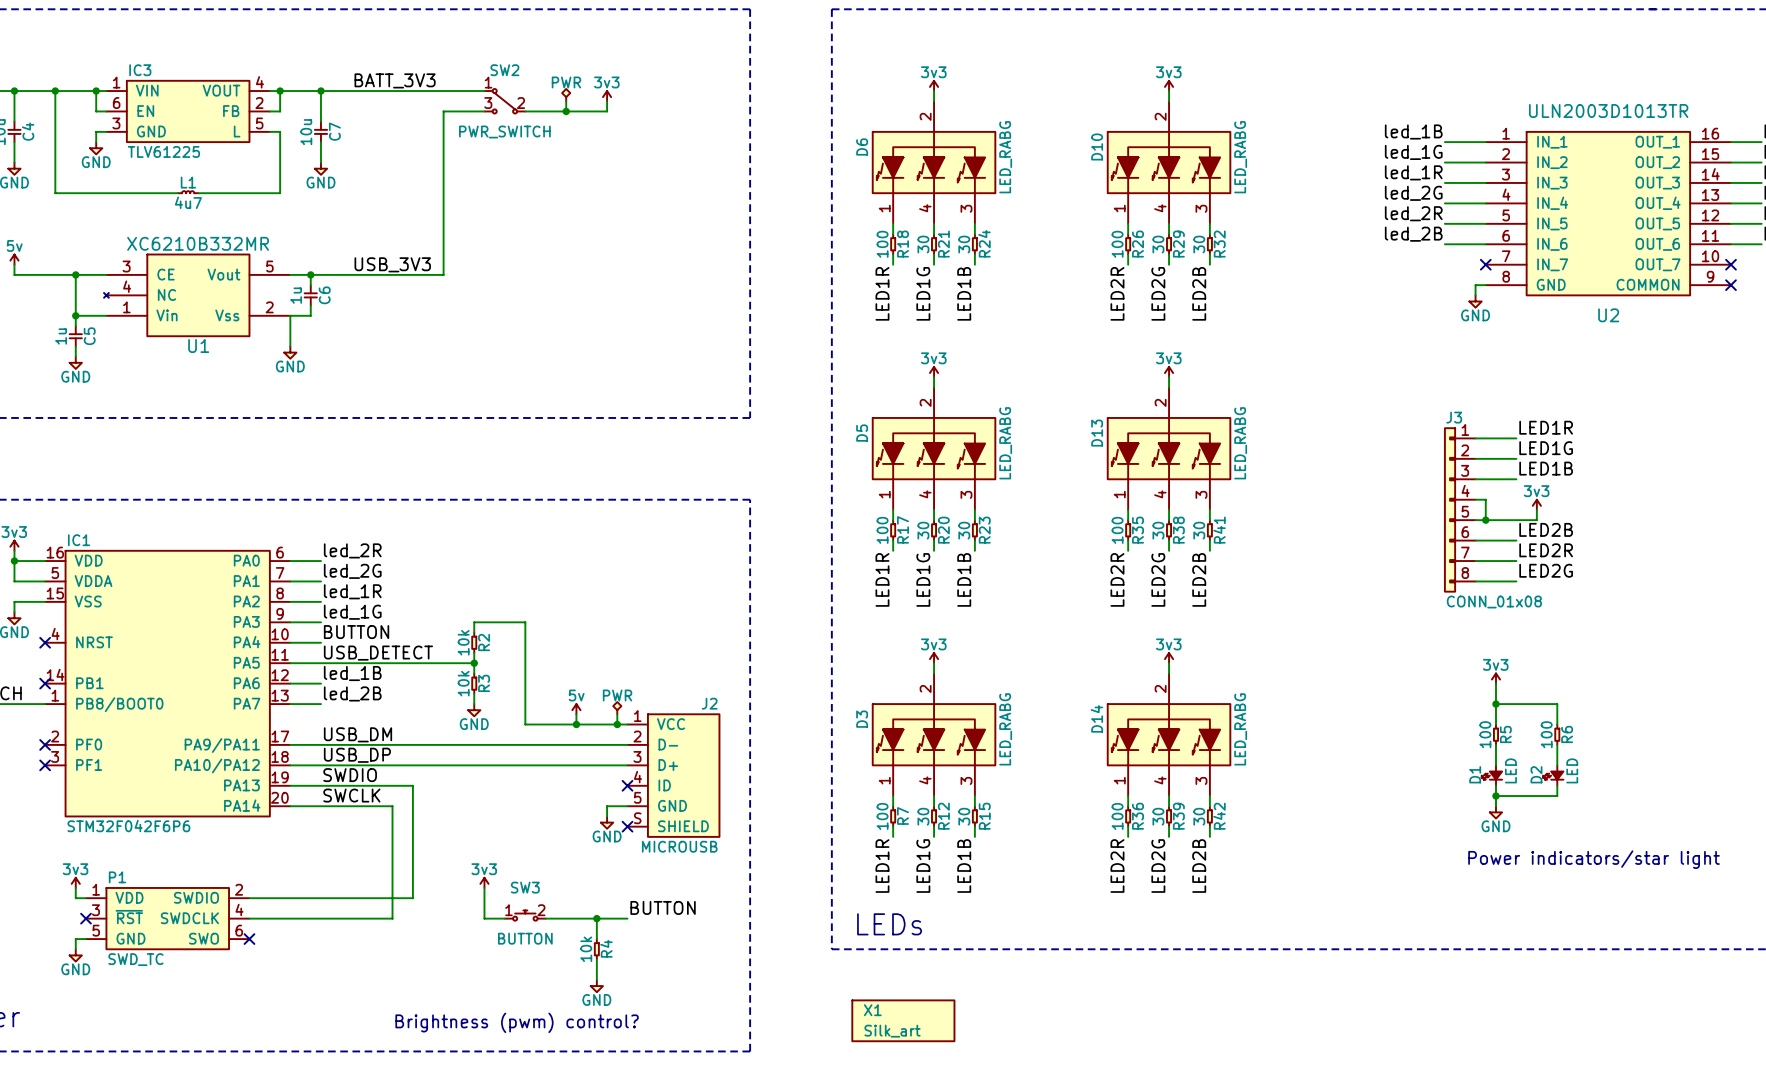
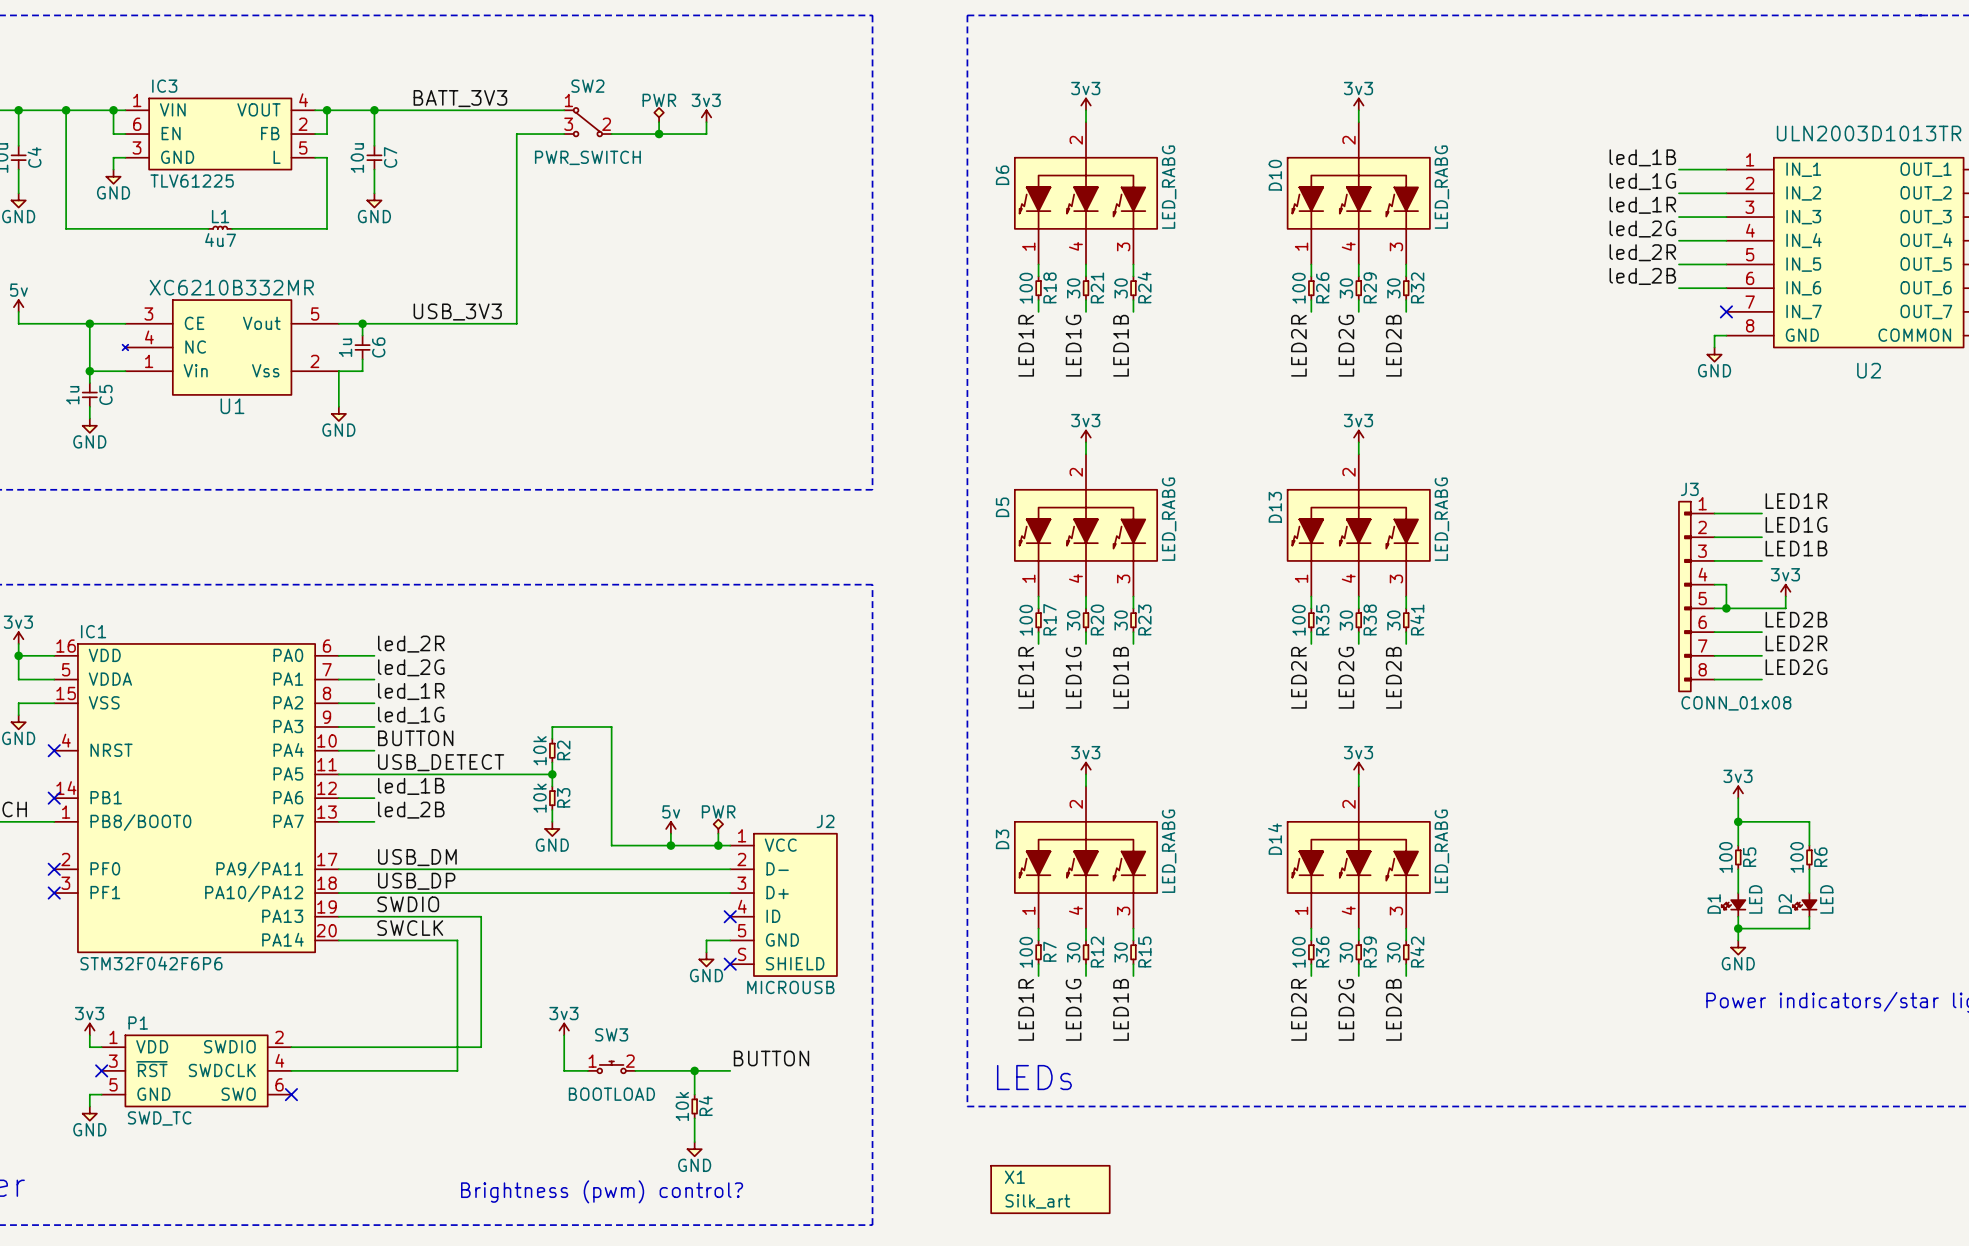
SW3 value: BUTTON (525, 938) -> BOOTLOAD (611, 1094)

